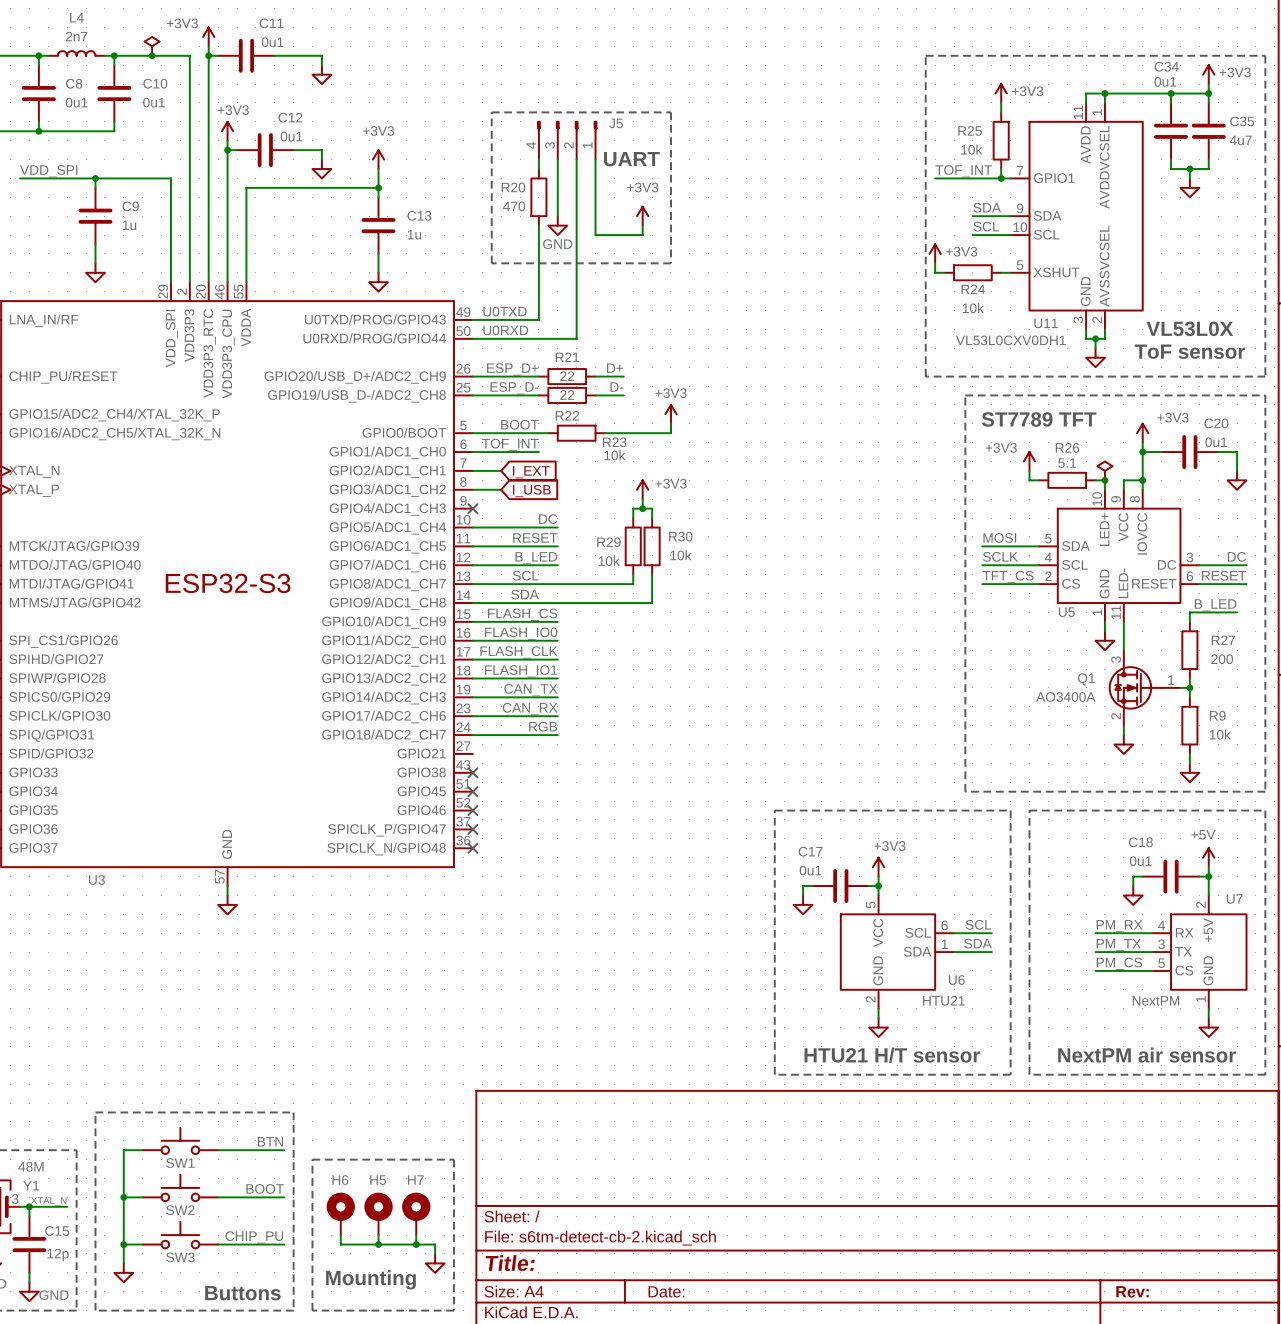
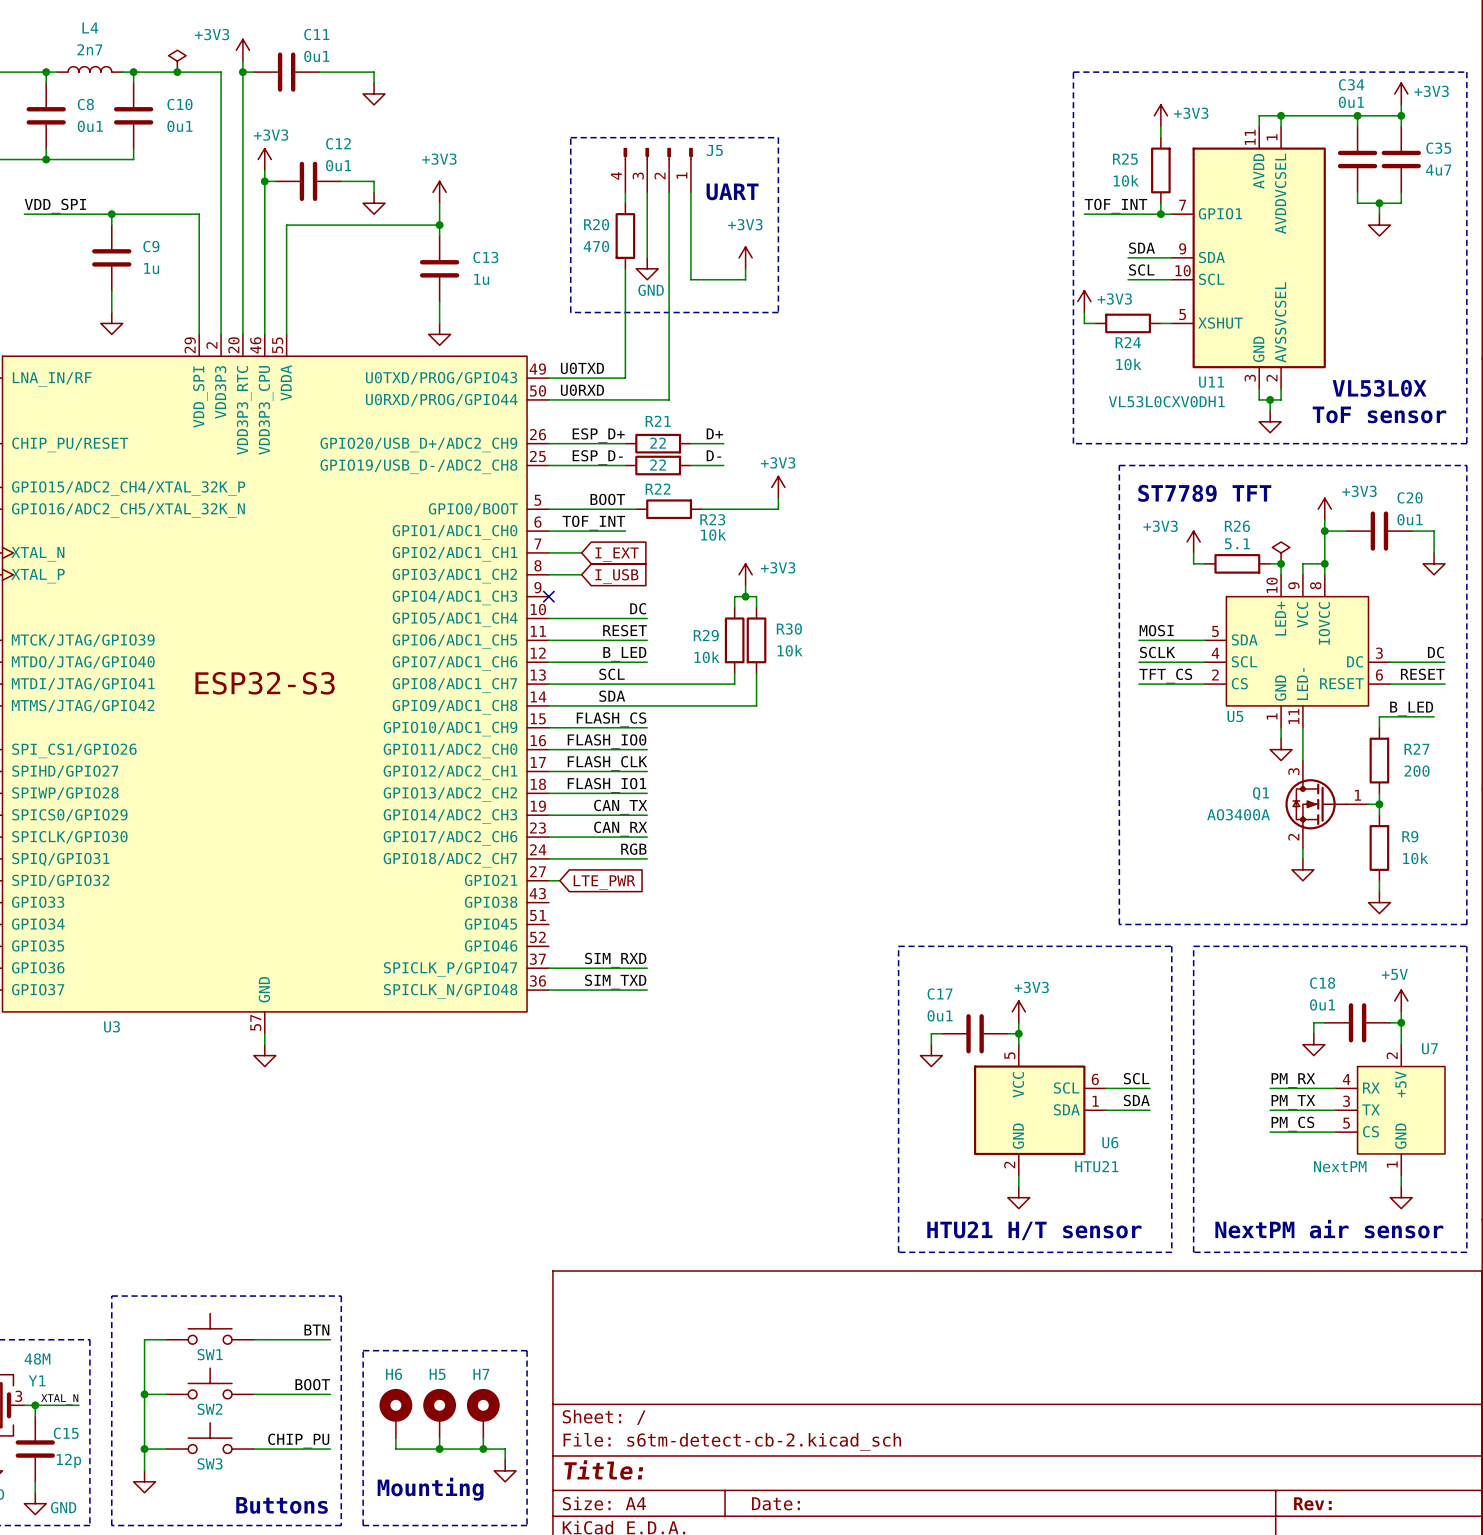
wire: none -> (548, 880) (559, 880)
global label: none -> LTE_PWR (604, 882)
no-connect mark: (472, 772) -> none
no-connect mark: (472, 791) -> none
no-connect mark: (472, 810) -> none
label: none -> SIM_RXD (615, 960)
wire: none -> (548, 968) (647, 968)
no-connect mark: (472, 829) -> none
label: none -> SIM_TXD (615, 981)
wire: none -> (548, 990) (647, 990)
no-connect mark: (472, 848) -> none

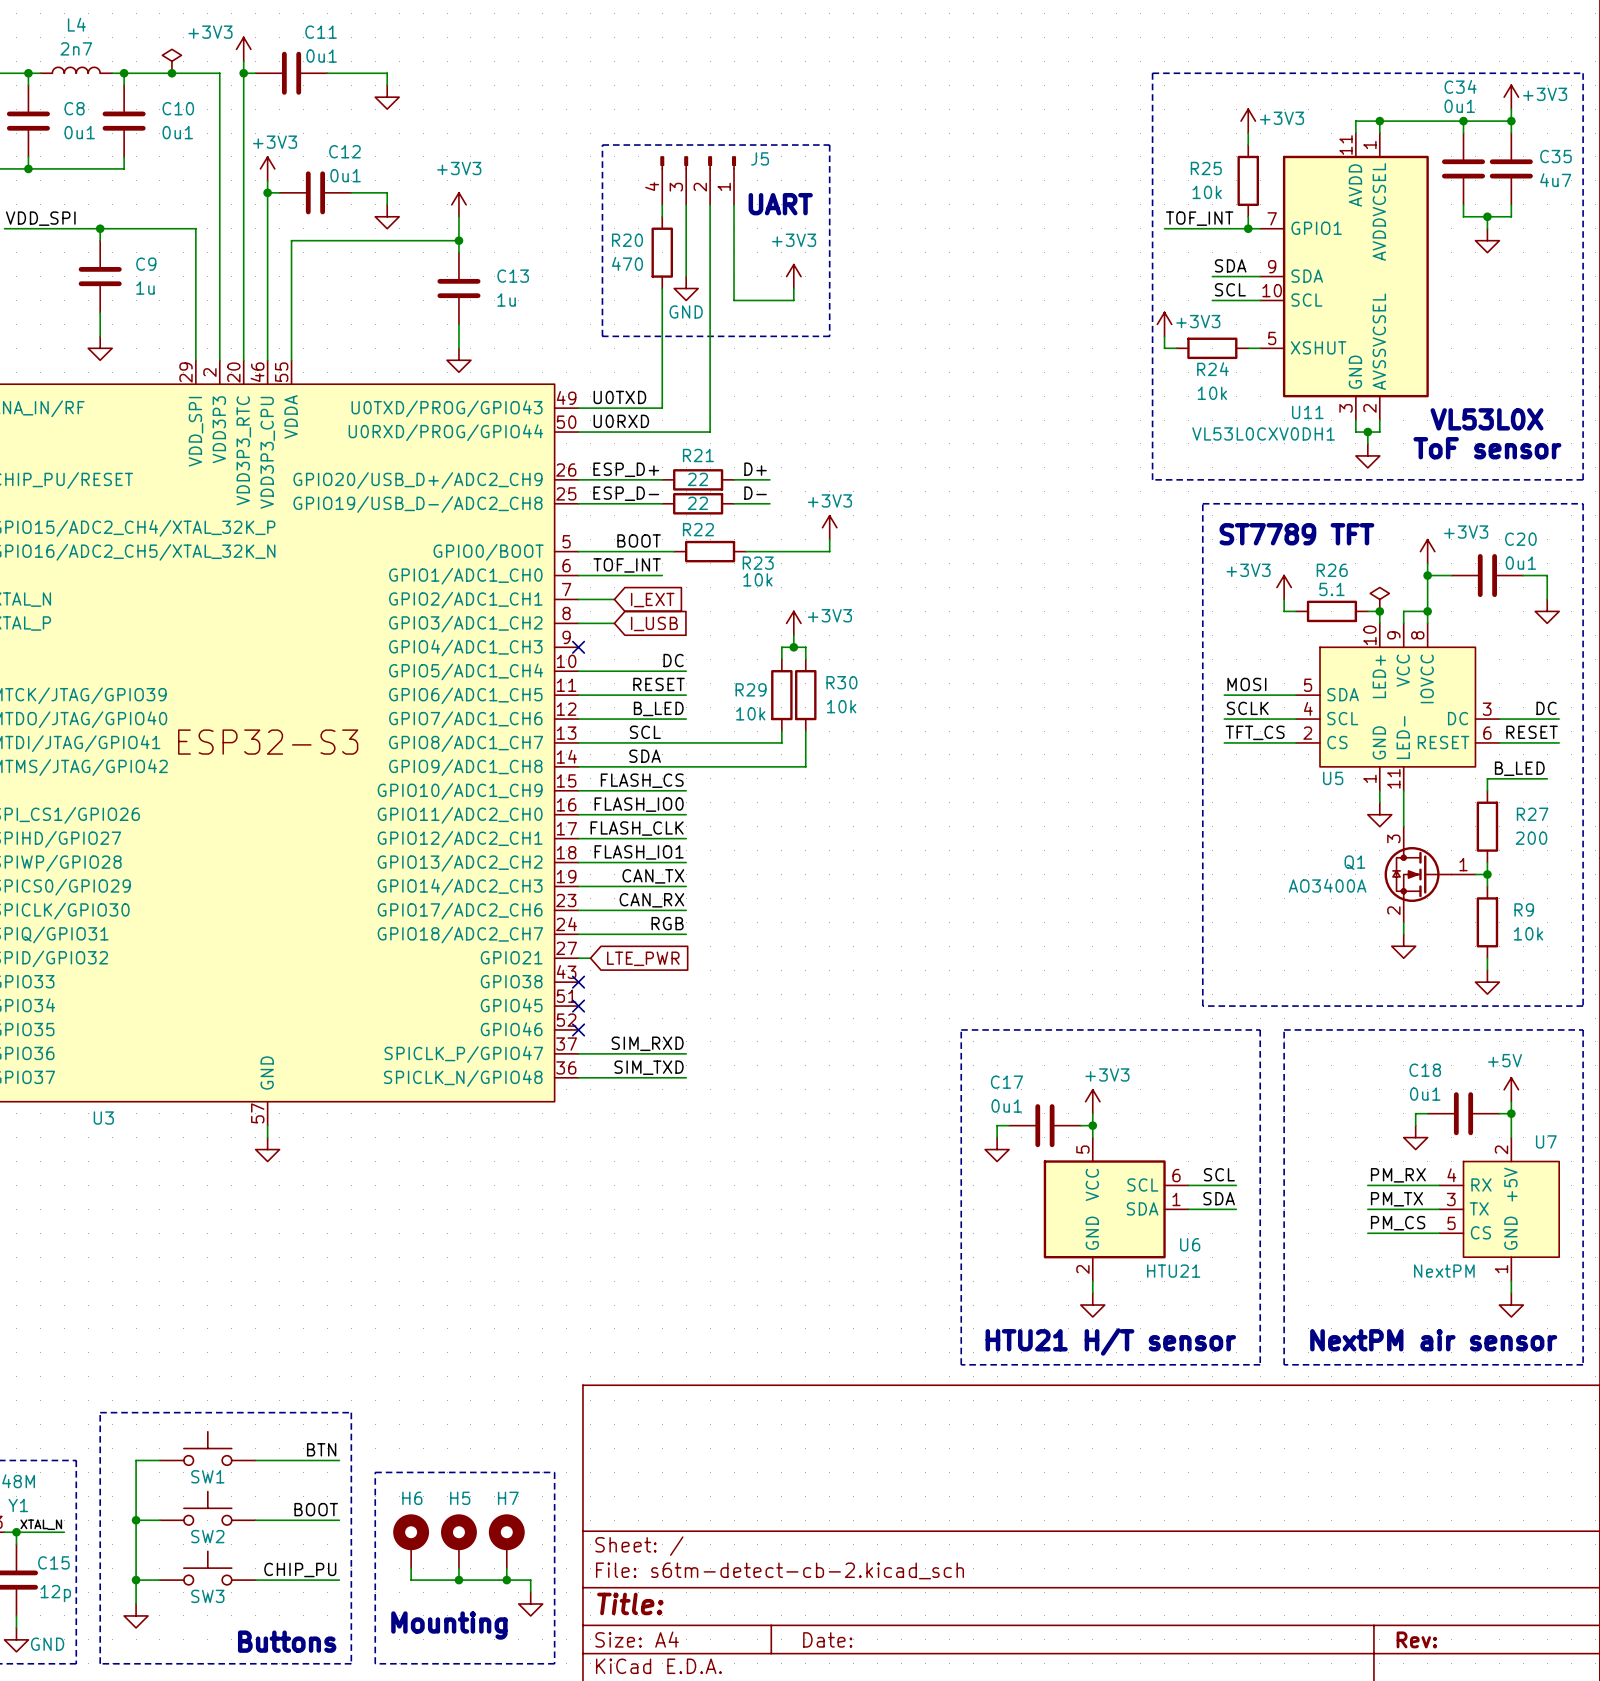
no-connect mark: none -> (578, 982)
no-connect mark: none -> (578, 1006)
no-connect mark: none -> (578, 1029)

